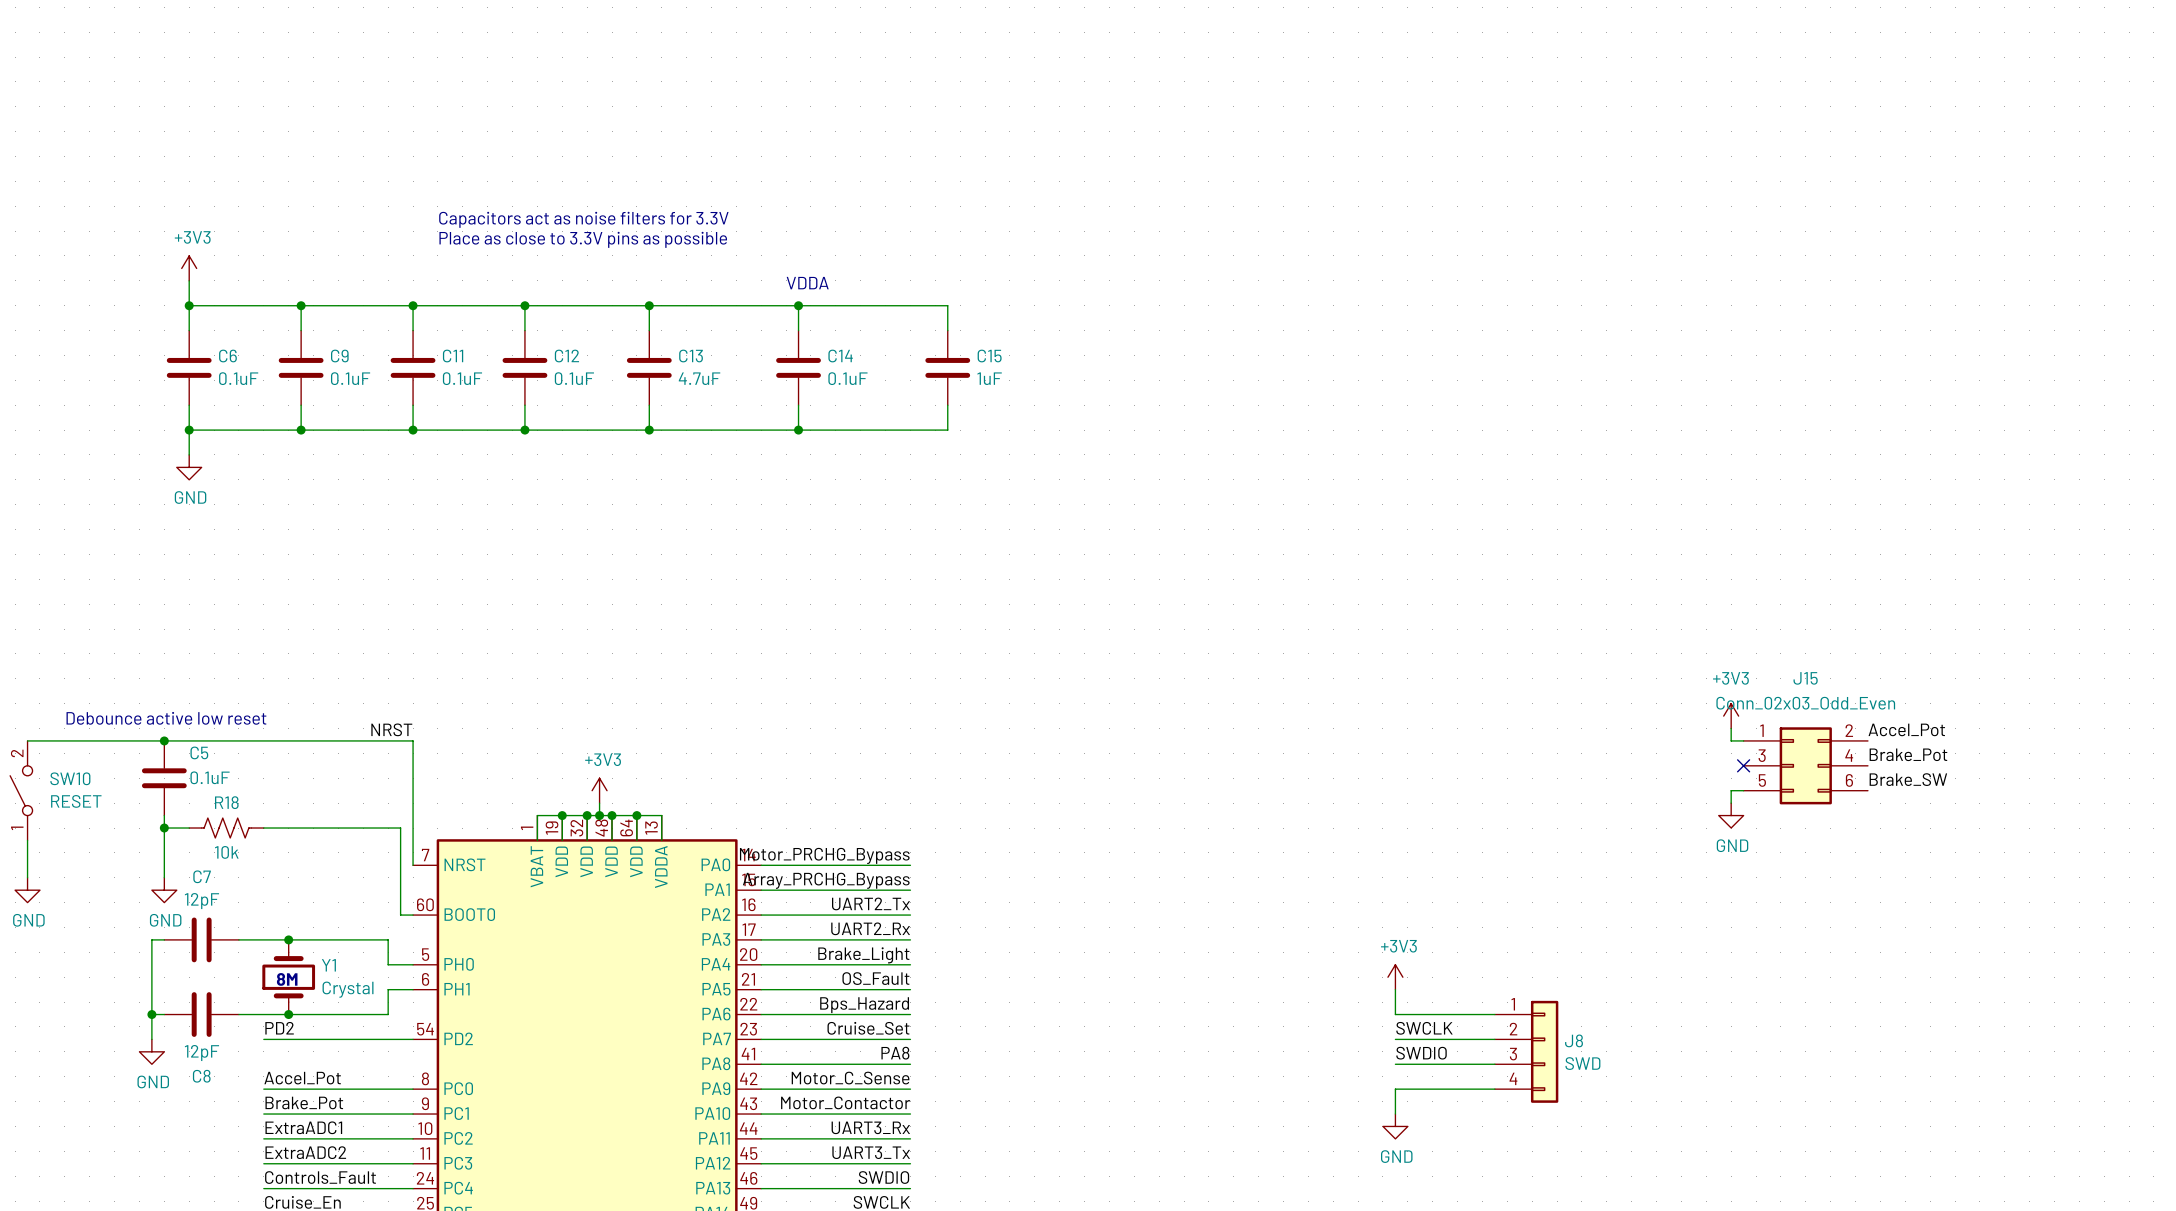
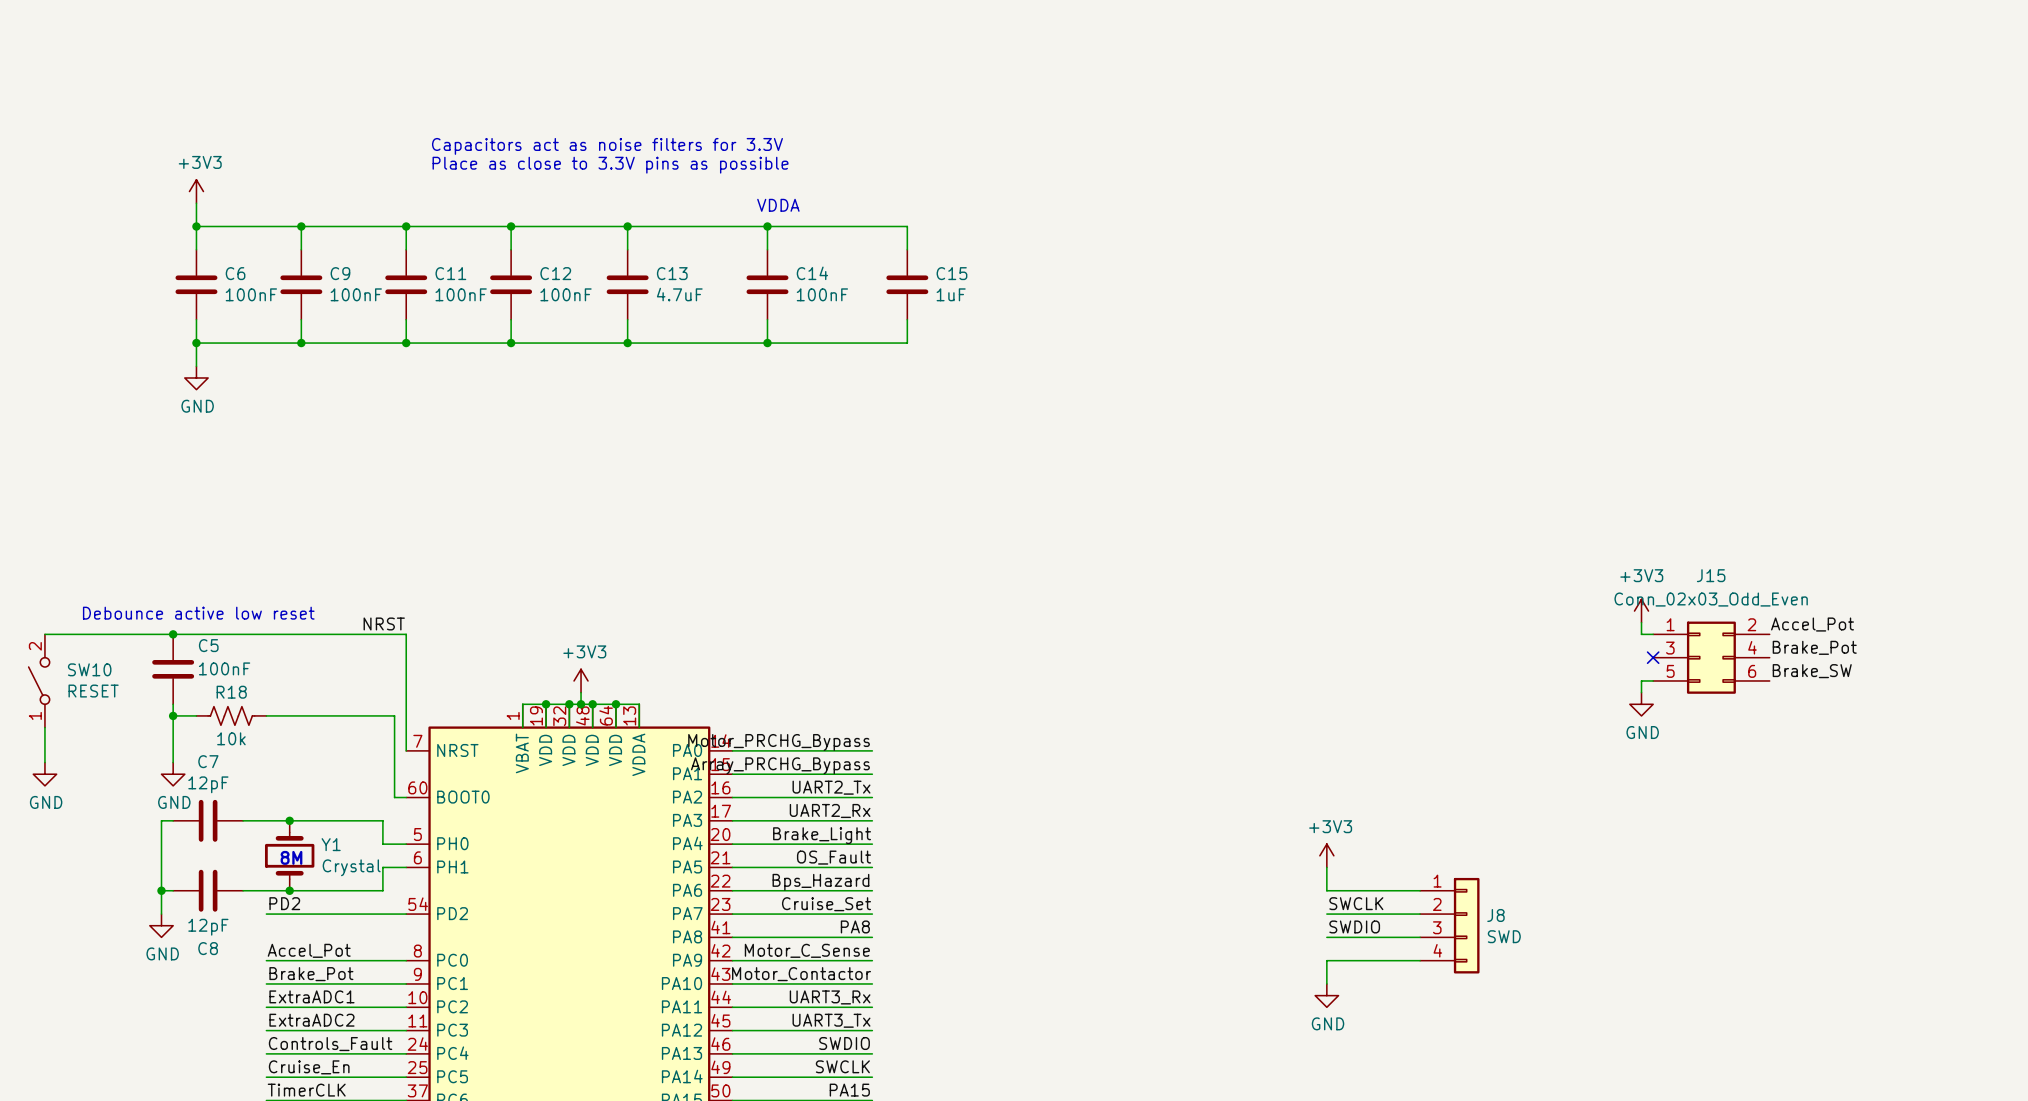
C6 value: 0.1uF (238, 378) -> 100nF (251, 294)
C9 value: 0.1uF (350, 378) -> 100nF (356, 294)
C11 value: 0.1uF (462, 378) -> 100nF (461, 294)
C12 value: 0.1uF (574, 378) -> 100nF (566, 294)
C14 value: 0.1uF (847, 378) -> 100nF (822, 294)
C5 value: 0.1uF (210, 777) -> 100nF (224, 668)

